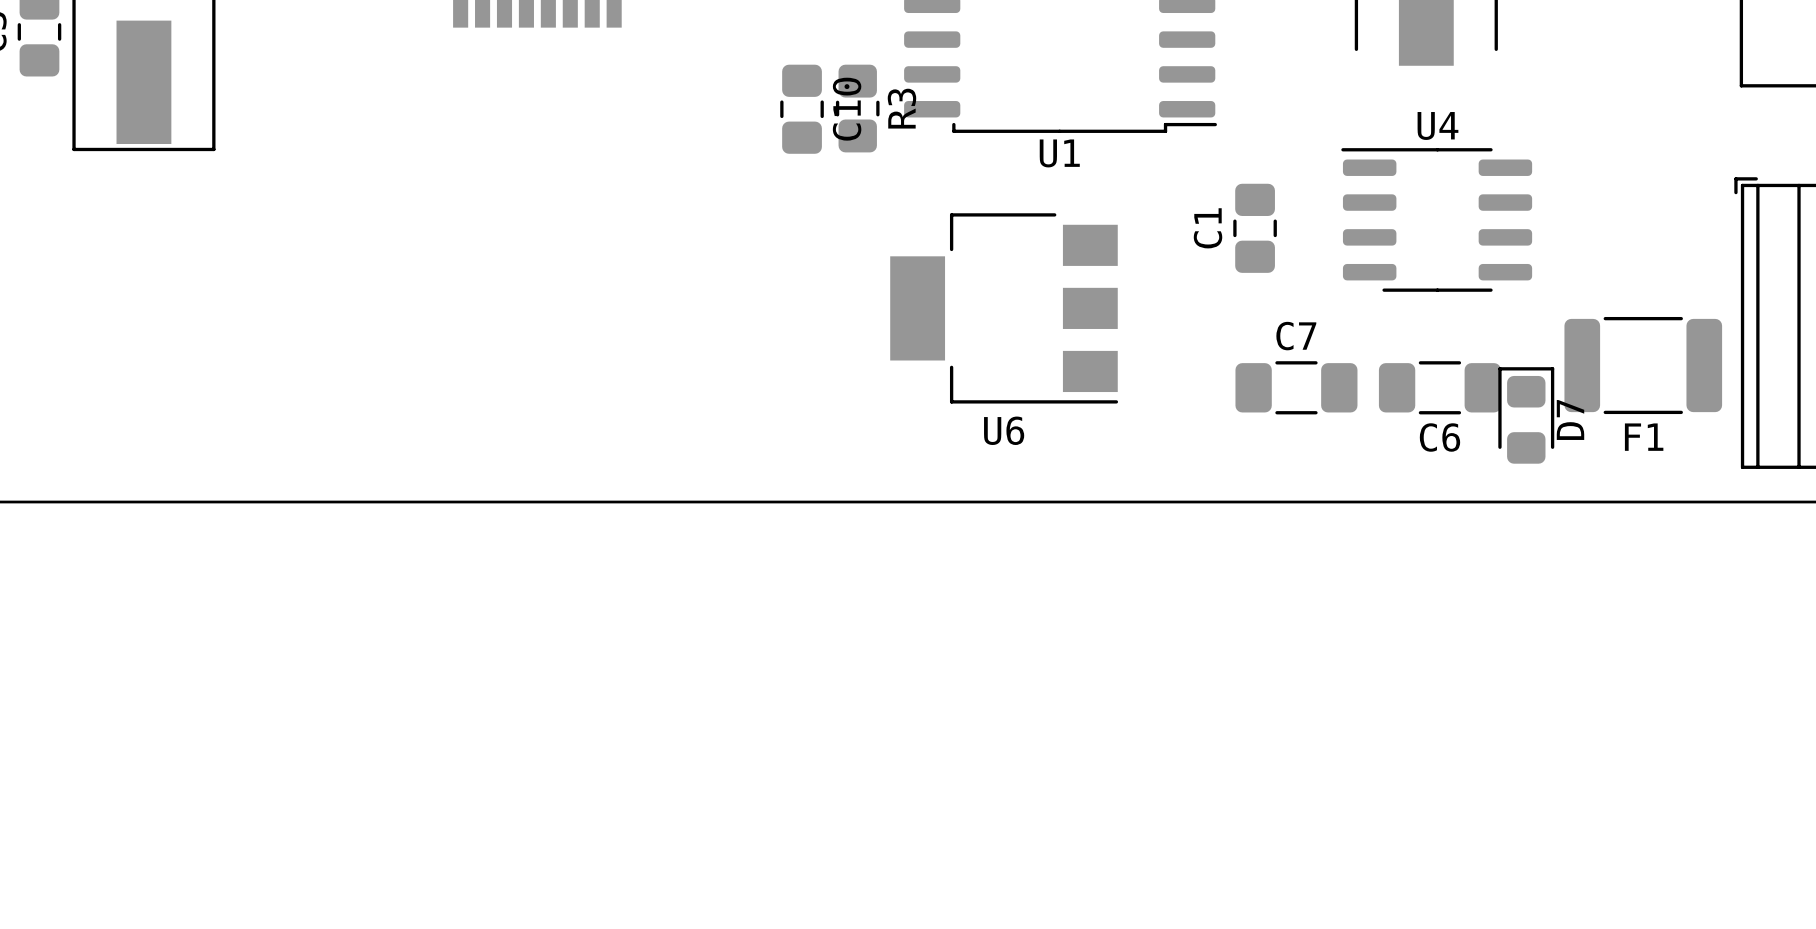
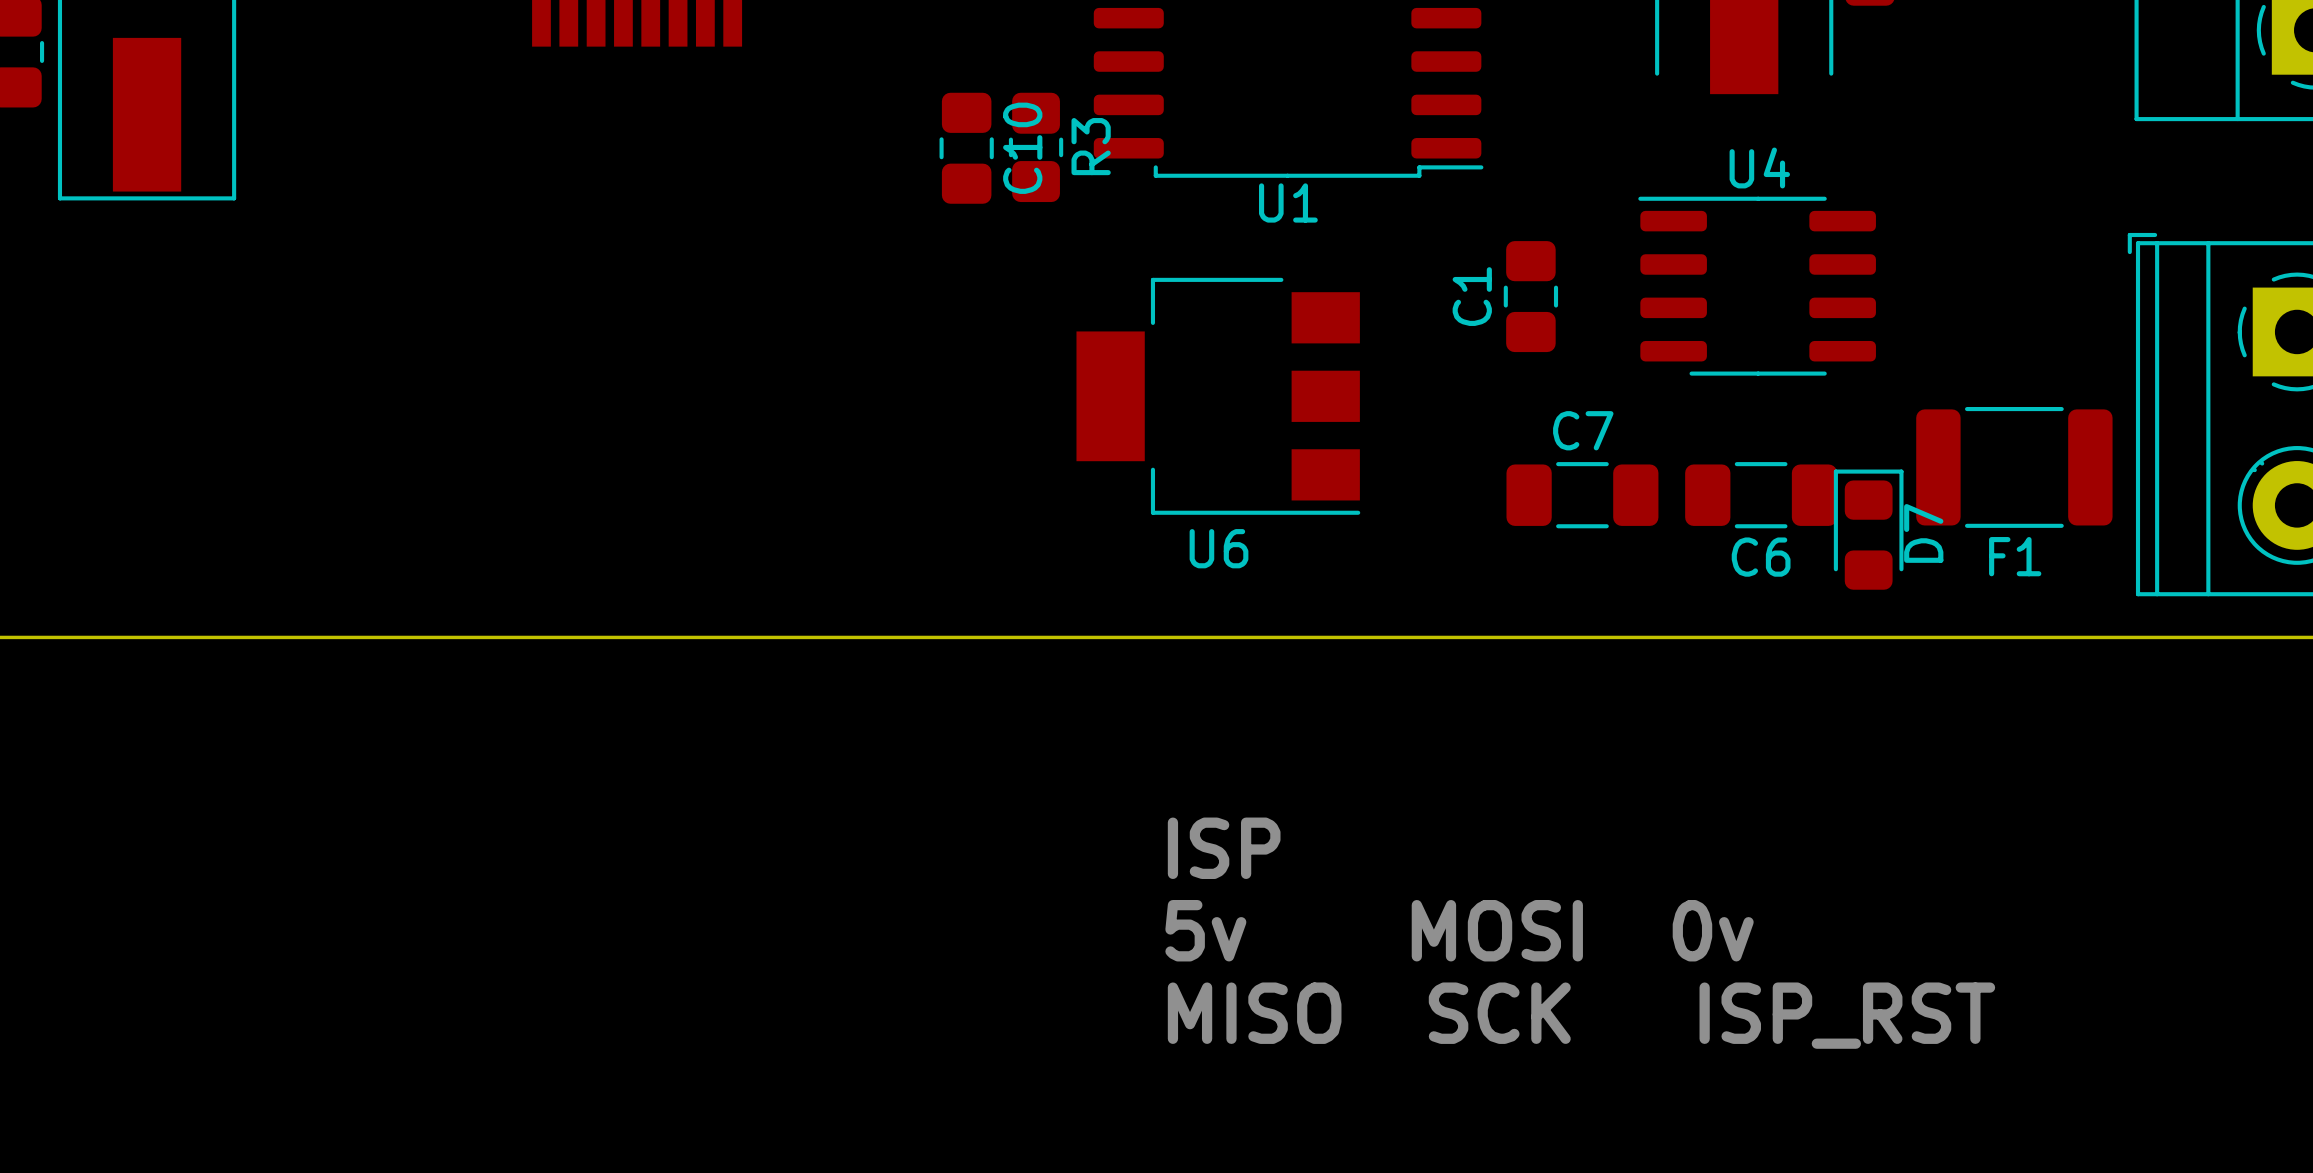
text: none -> ISP (1224, 848)
text: none -> 5v MOSI 0v (1459, 930)
text: none -> MISO SCK ISP_RST (1581, 1015)

